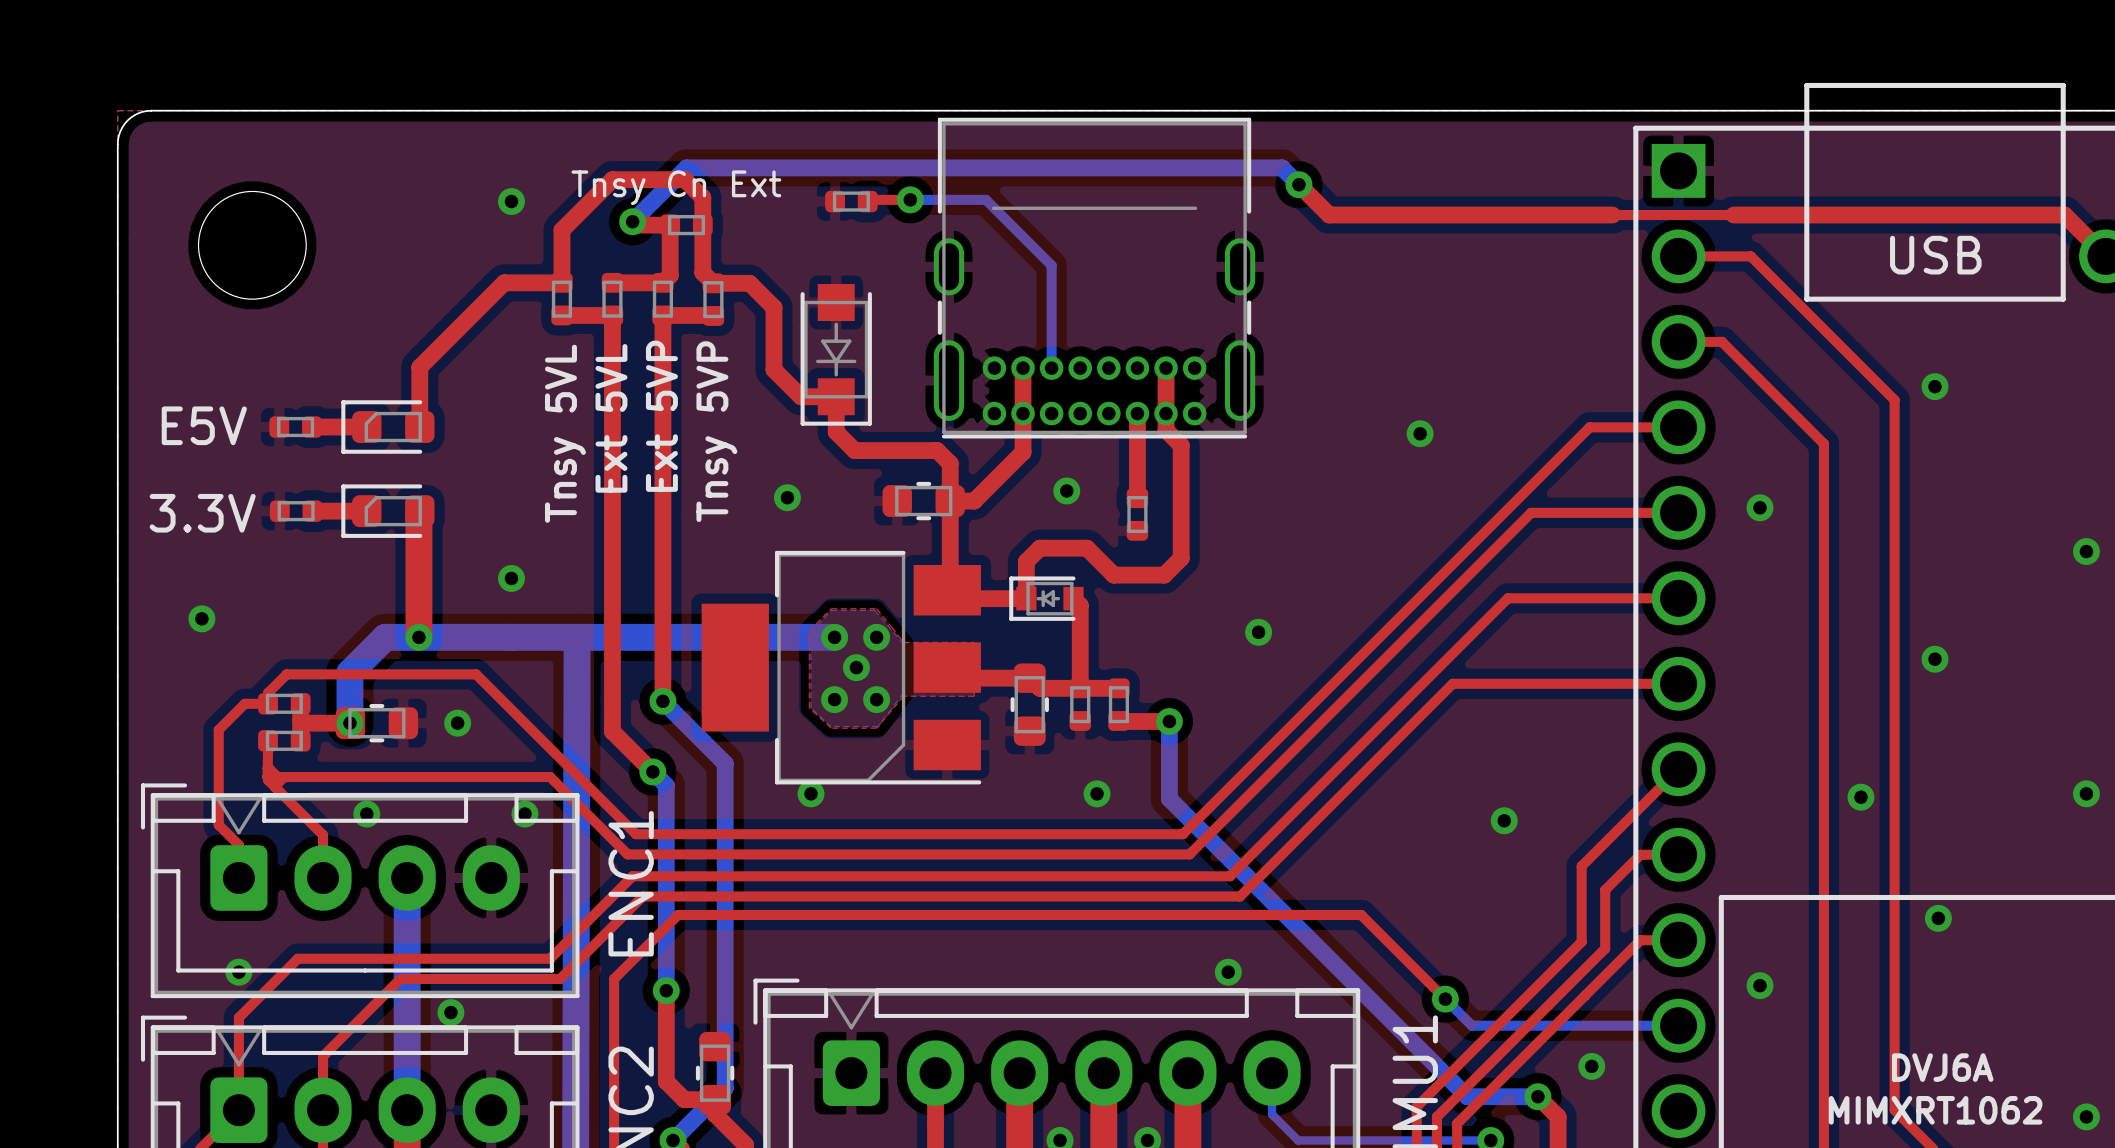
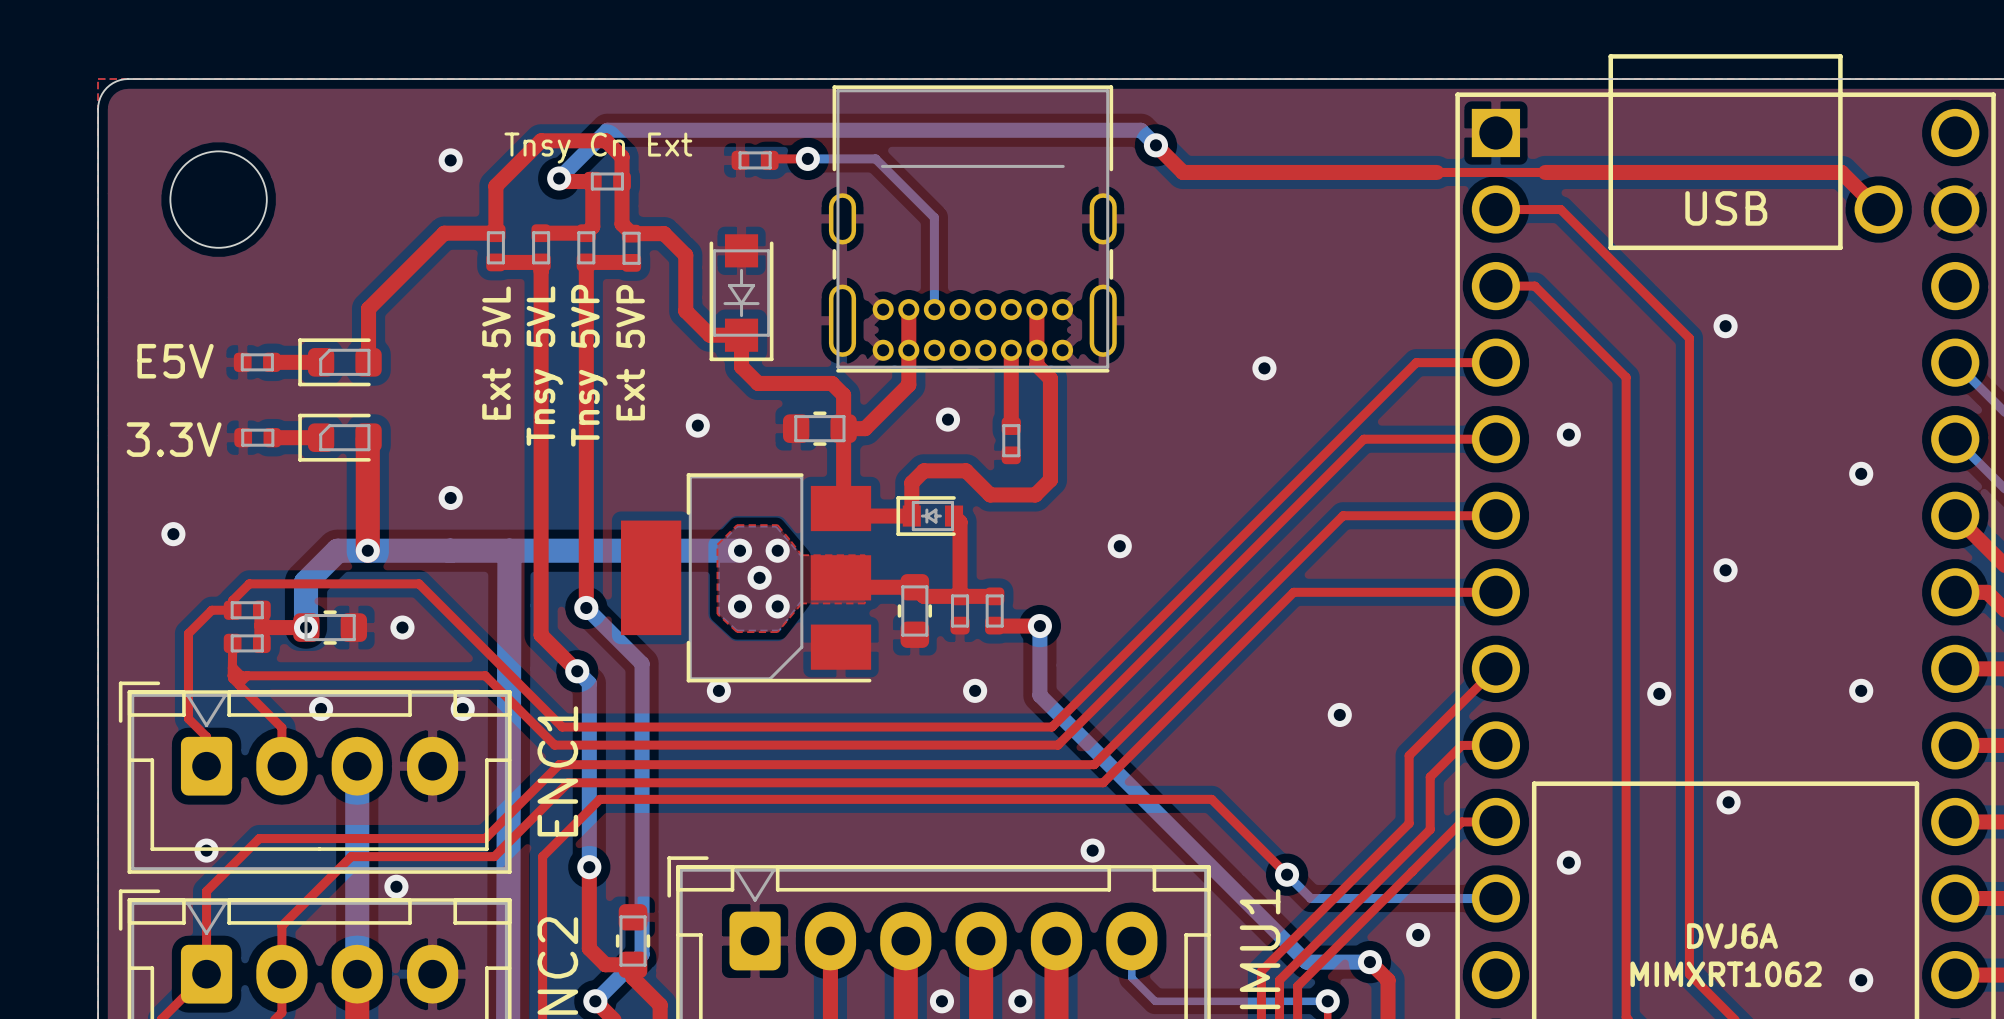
text: Ext 5VP (661, 416) -> Tnsy 5VP (589, 365)
text: Ext 5VL (611, 418) -> Tnsy 5VL (544, 366)
text: Tnsy 5VP (716, 431) -> Ext 5VP (630, 352)
text: Tnsy 5VL (565, 433) -> Ext 5VL (496, 353)

